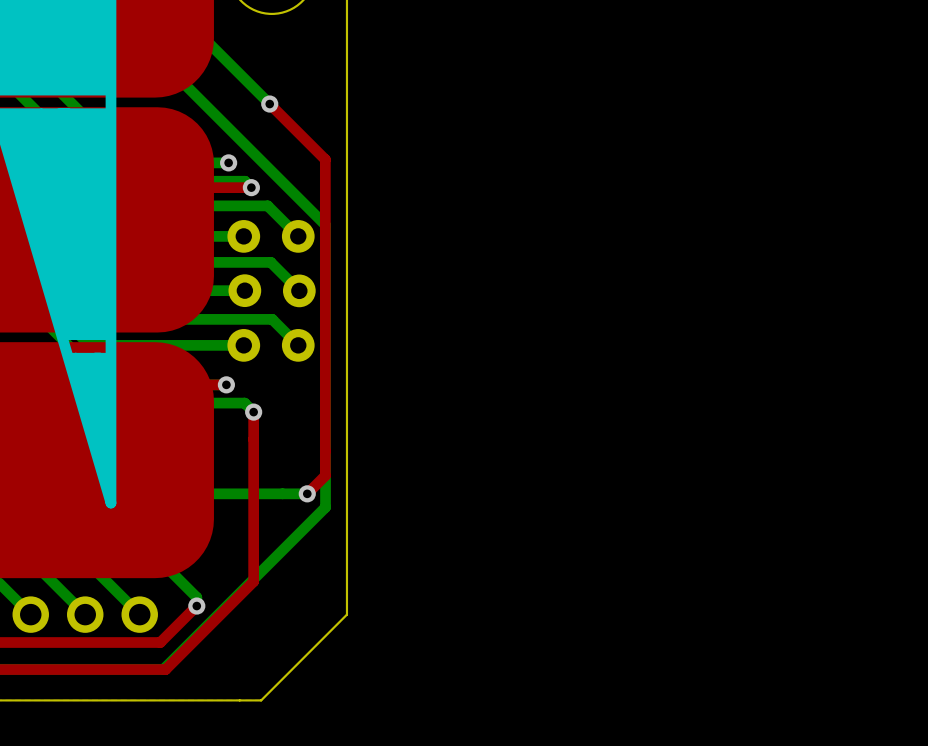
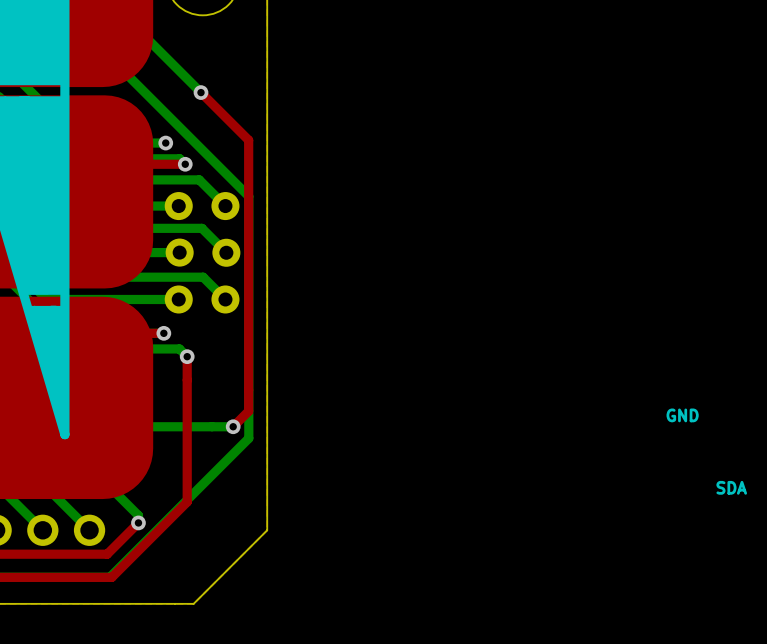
text: none -> GND (682, 415)
text: none -> SDA (731, 487)

